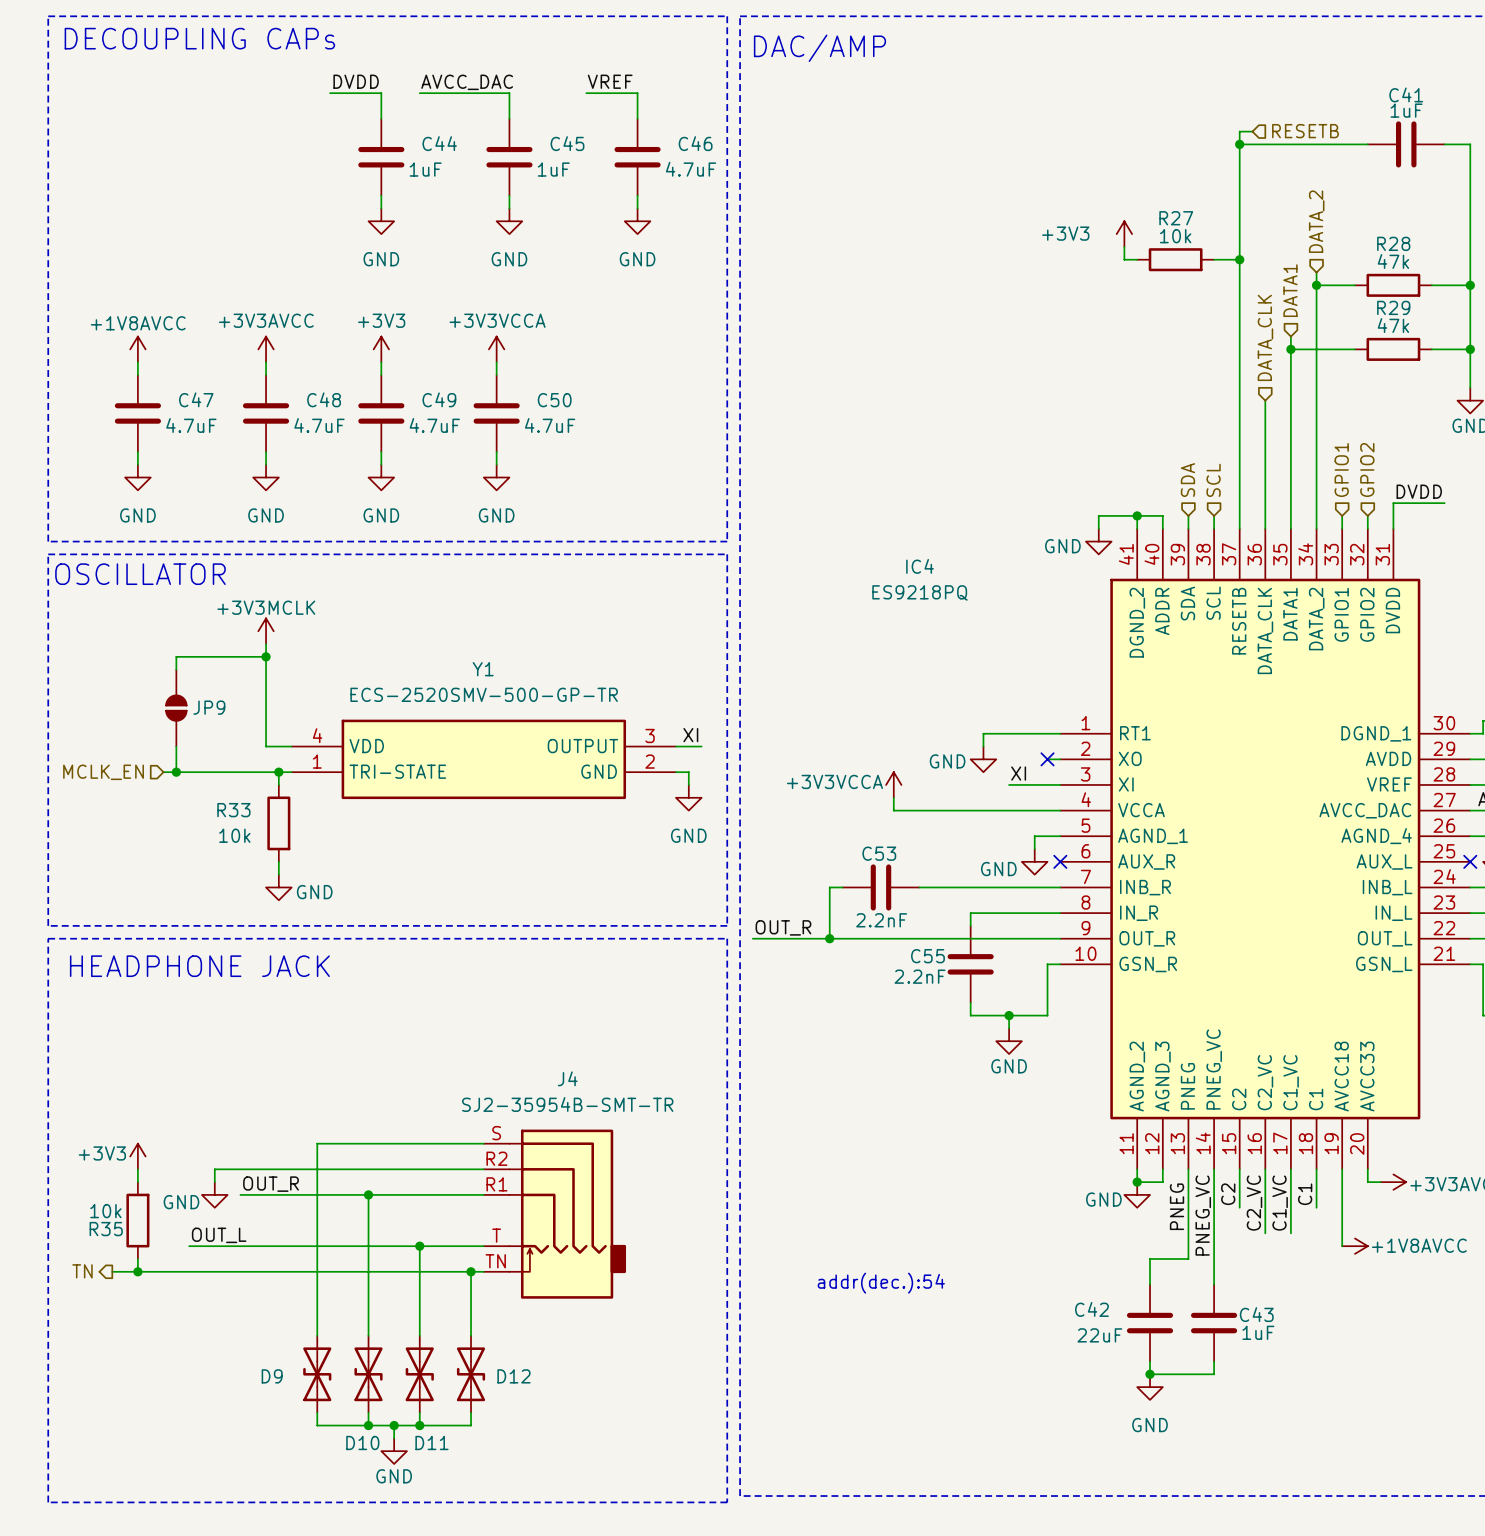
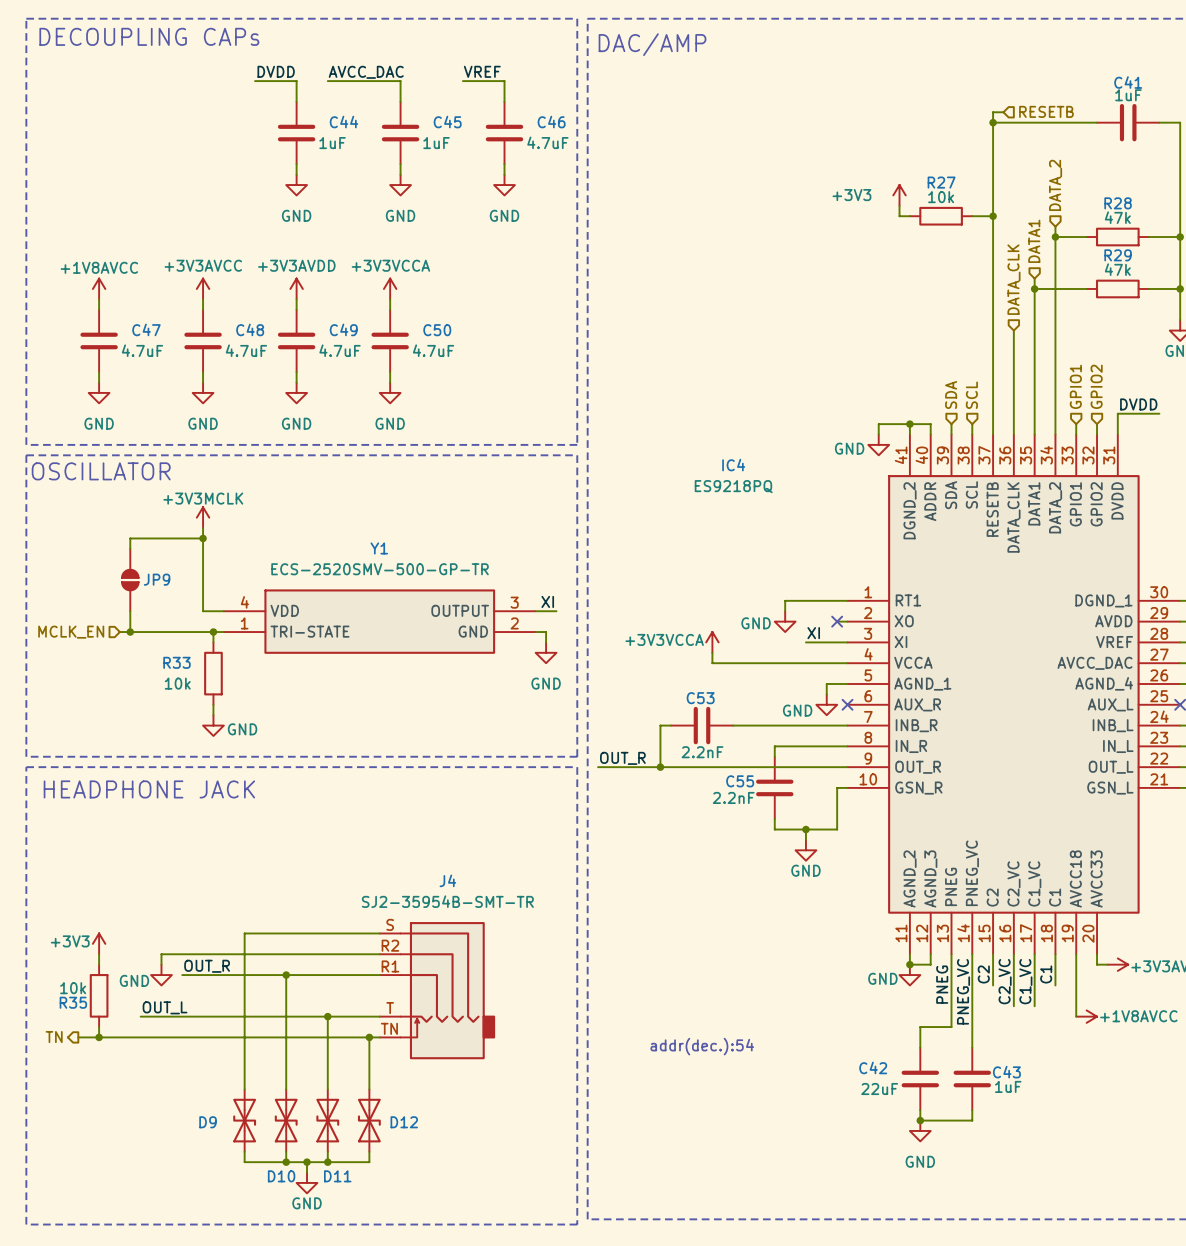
power symbol: +3V3 (381, 349) -> +3V3AVDD (296, 288)

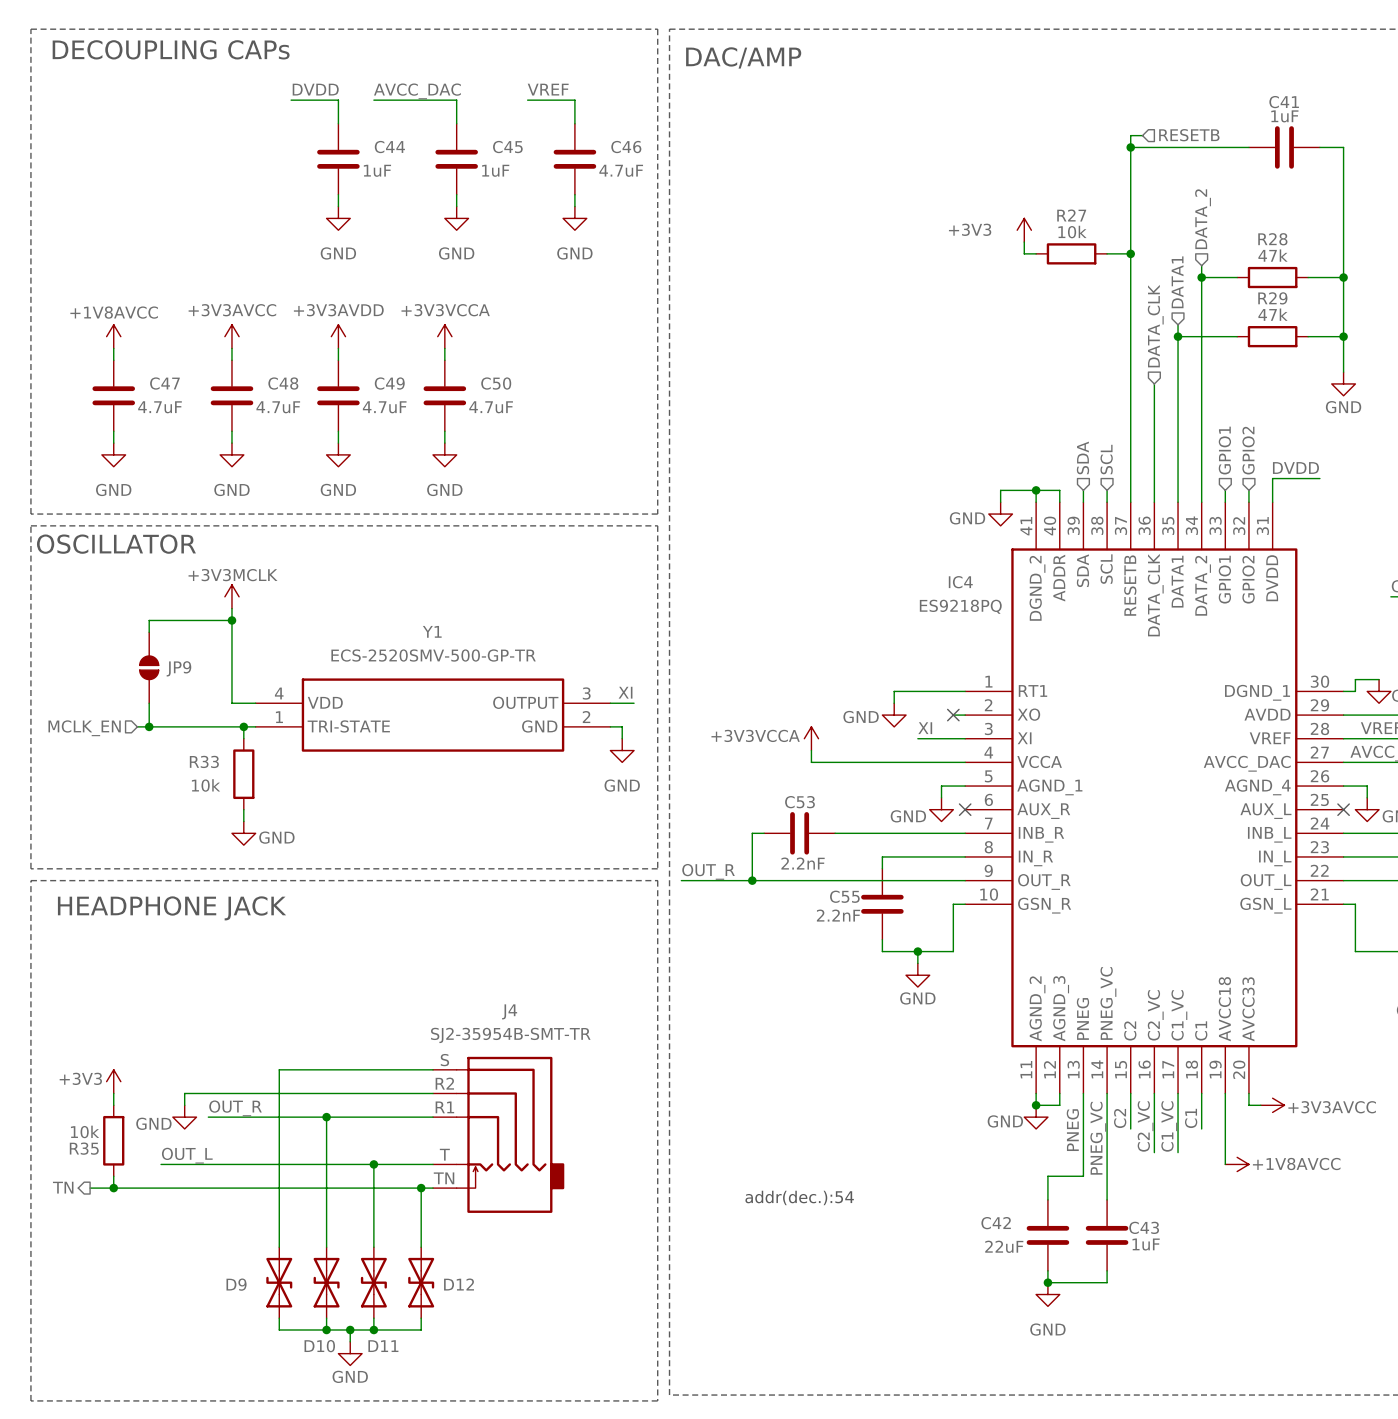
IC4 name position: IC4 (733, 465) -> IC4 (960, 582)
IC4 value position: ES9218PQ (733, 486) -> ES9218PQ (960, 606)

